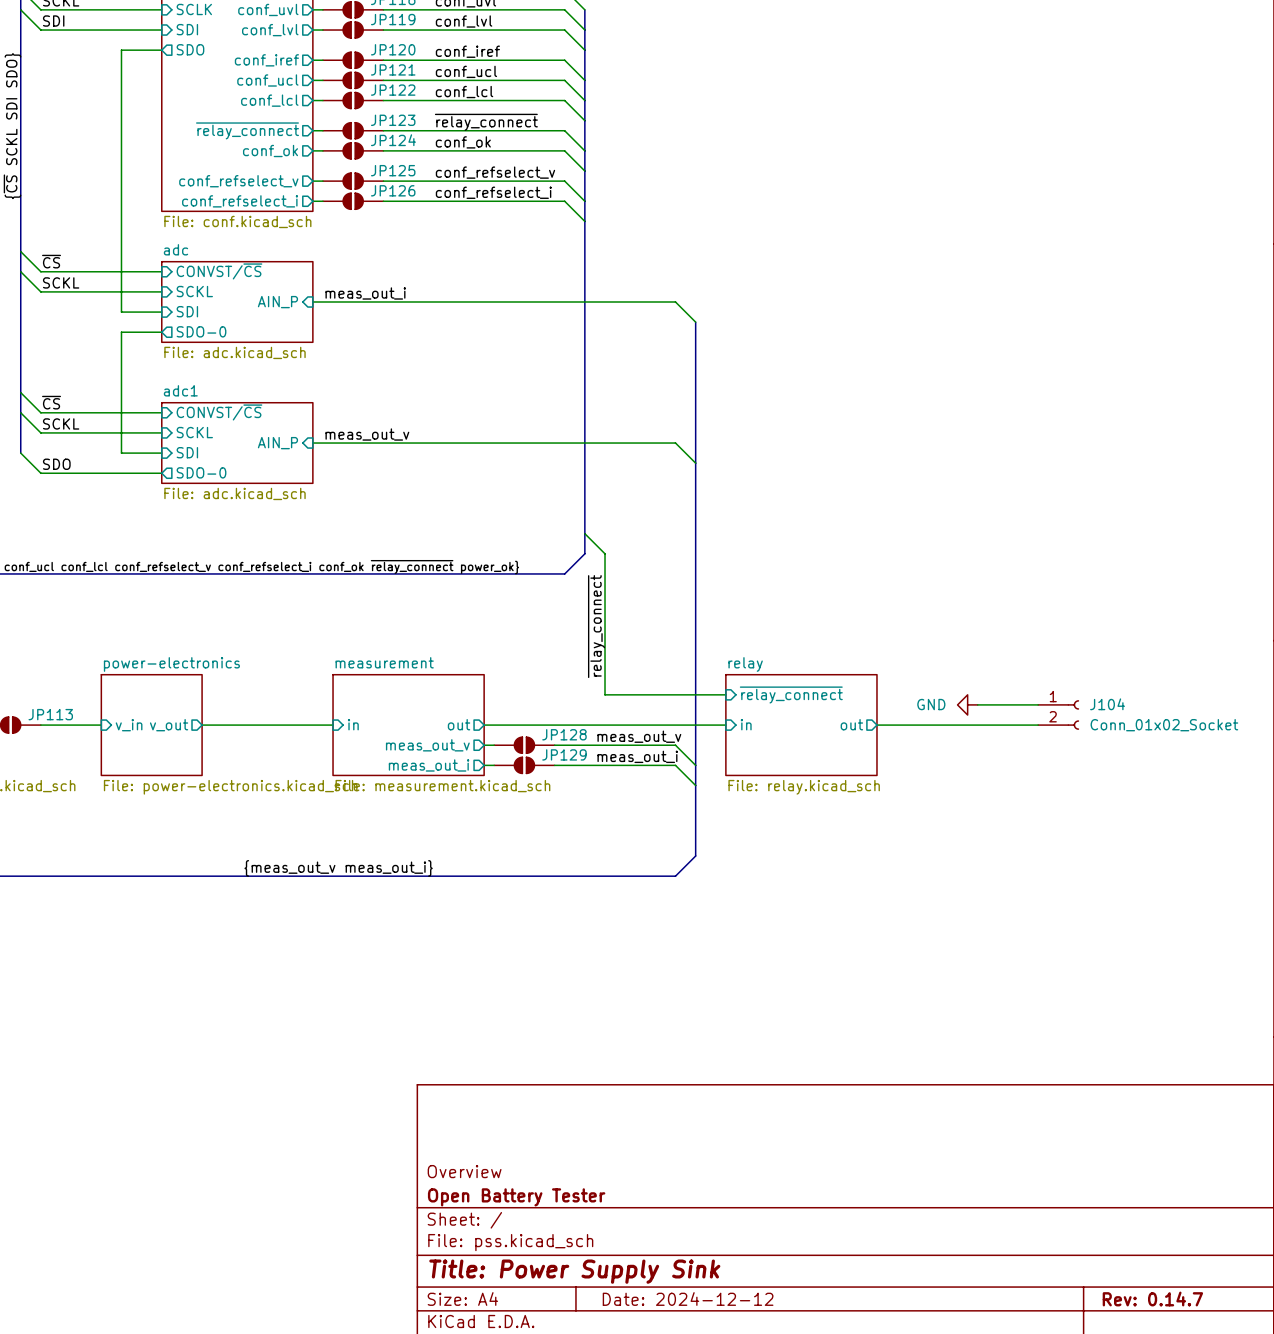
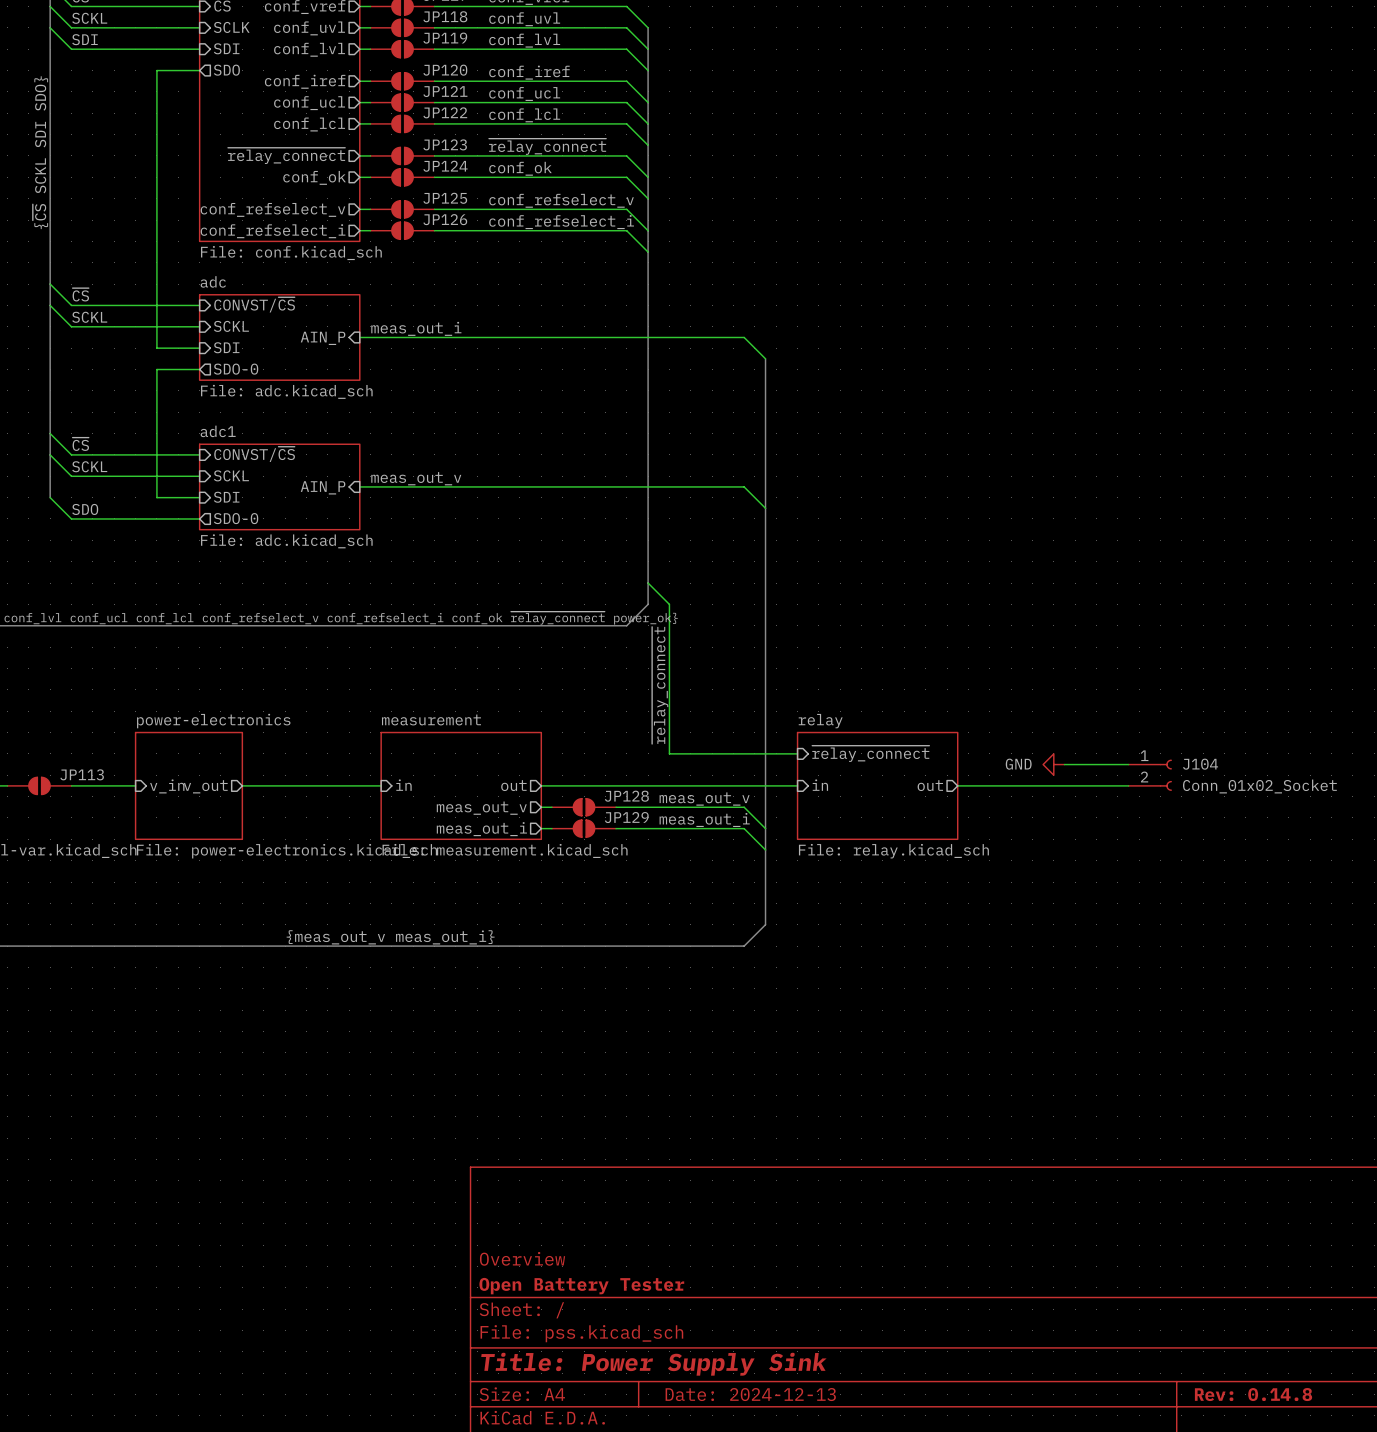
title block: Date: 2024-12-12 (688, 1299) -> Date: 2024-12-13 (750, 1394)
title block: Rev: 0.14.7 (1152, 1299) -> Rev: 0.14.8 (1253, 1394)

